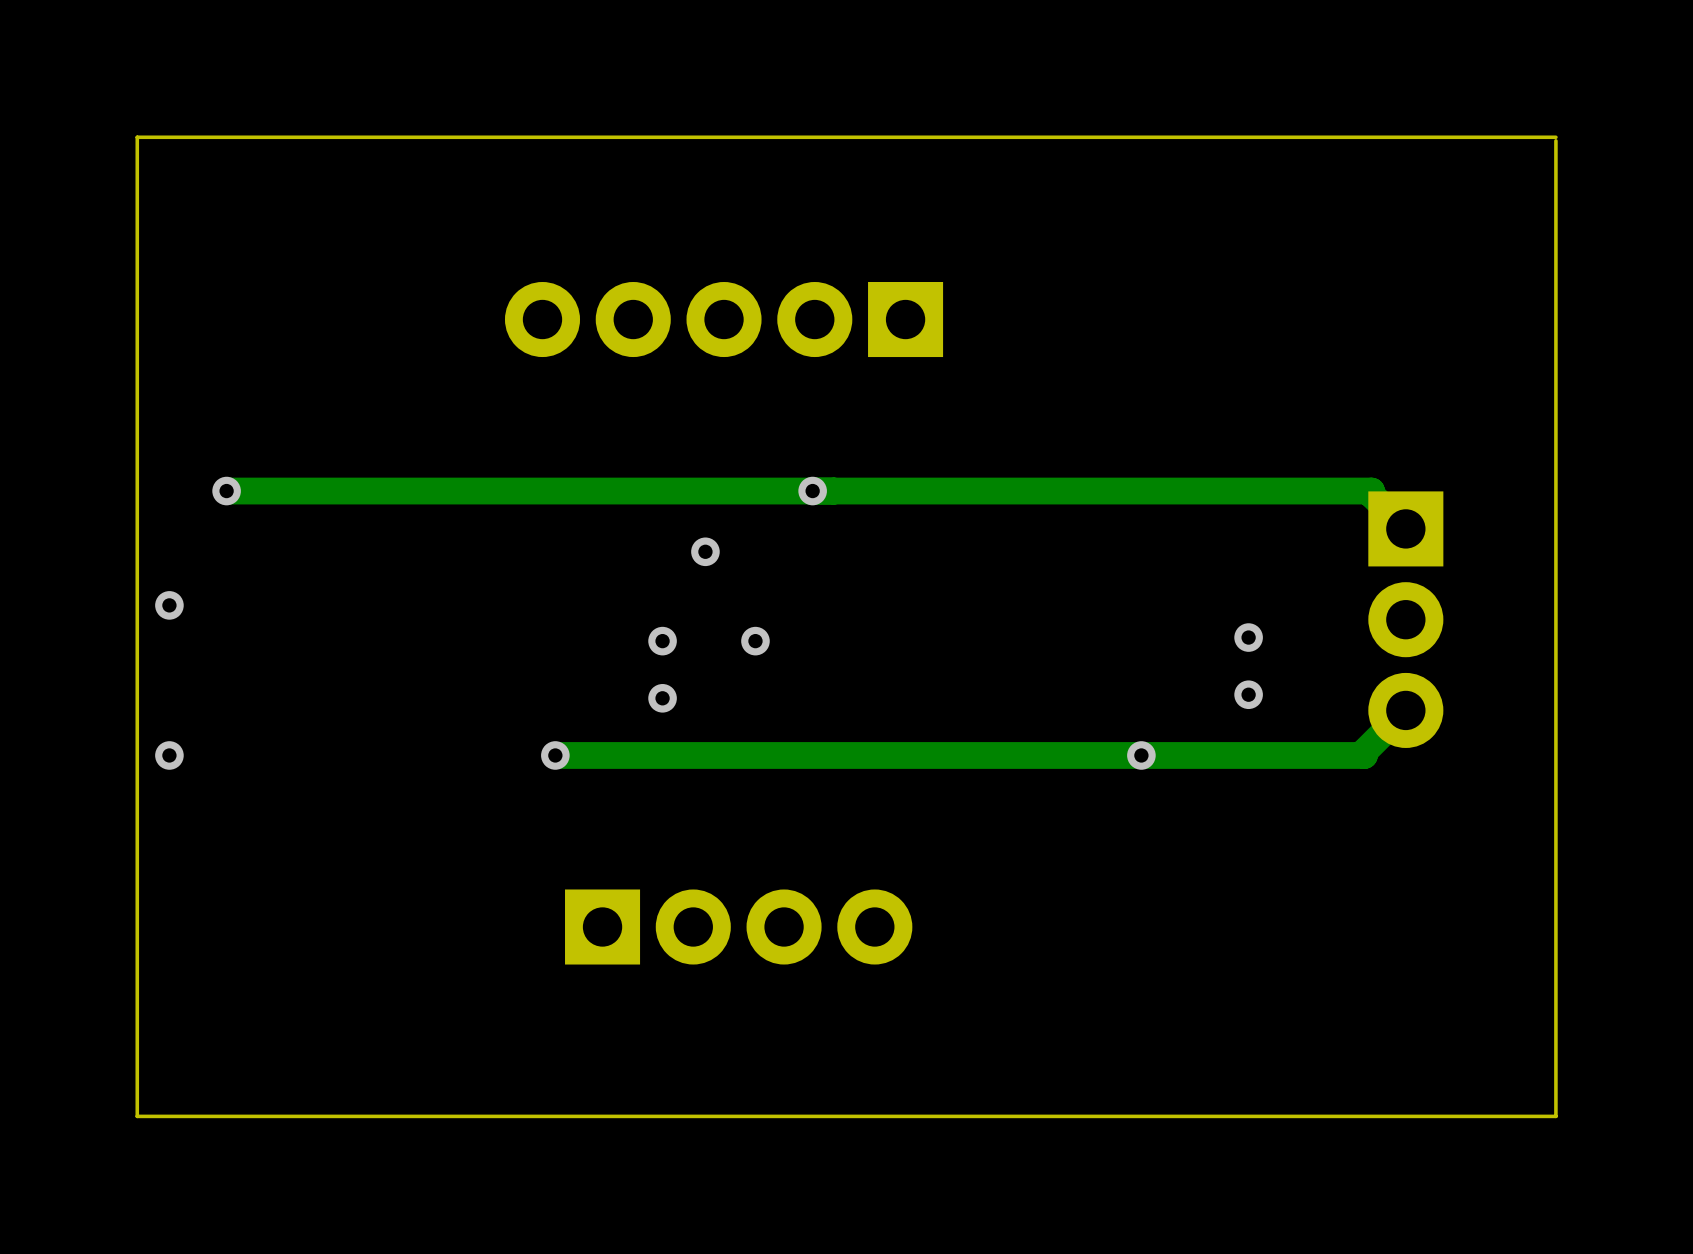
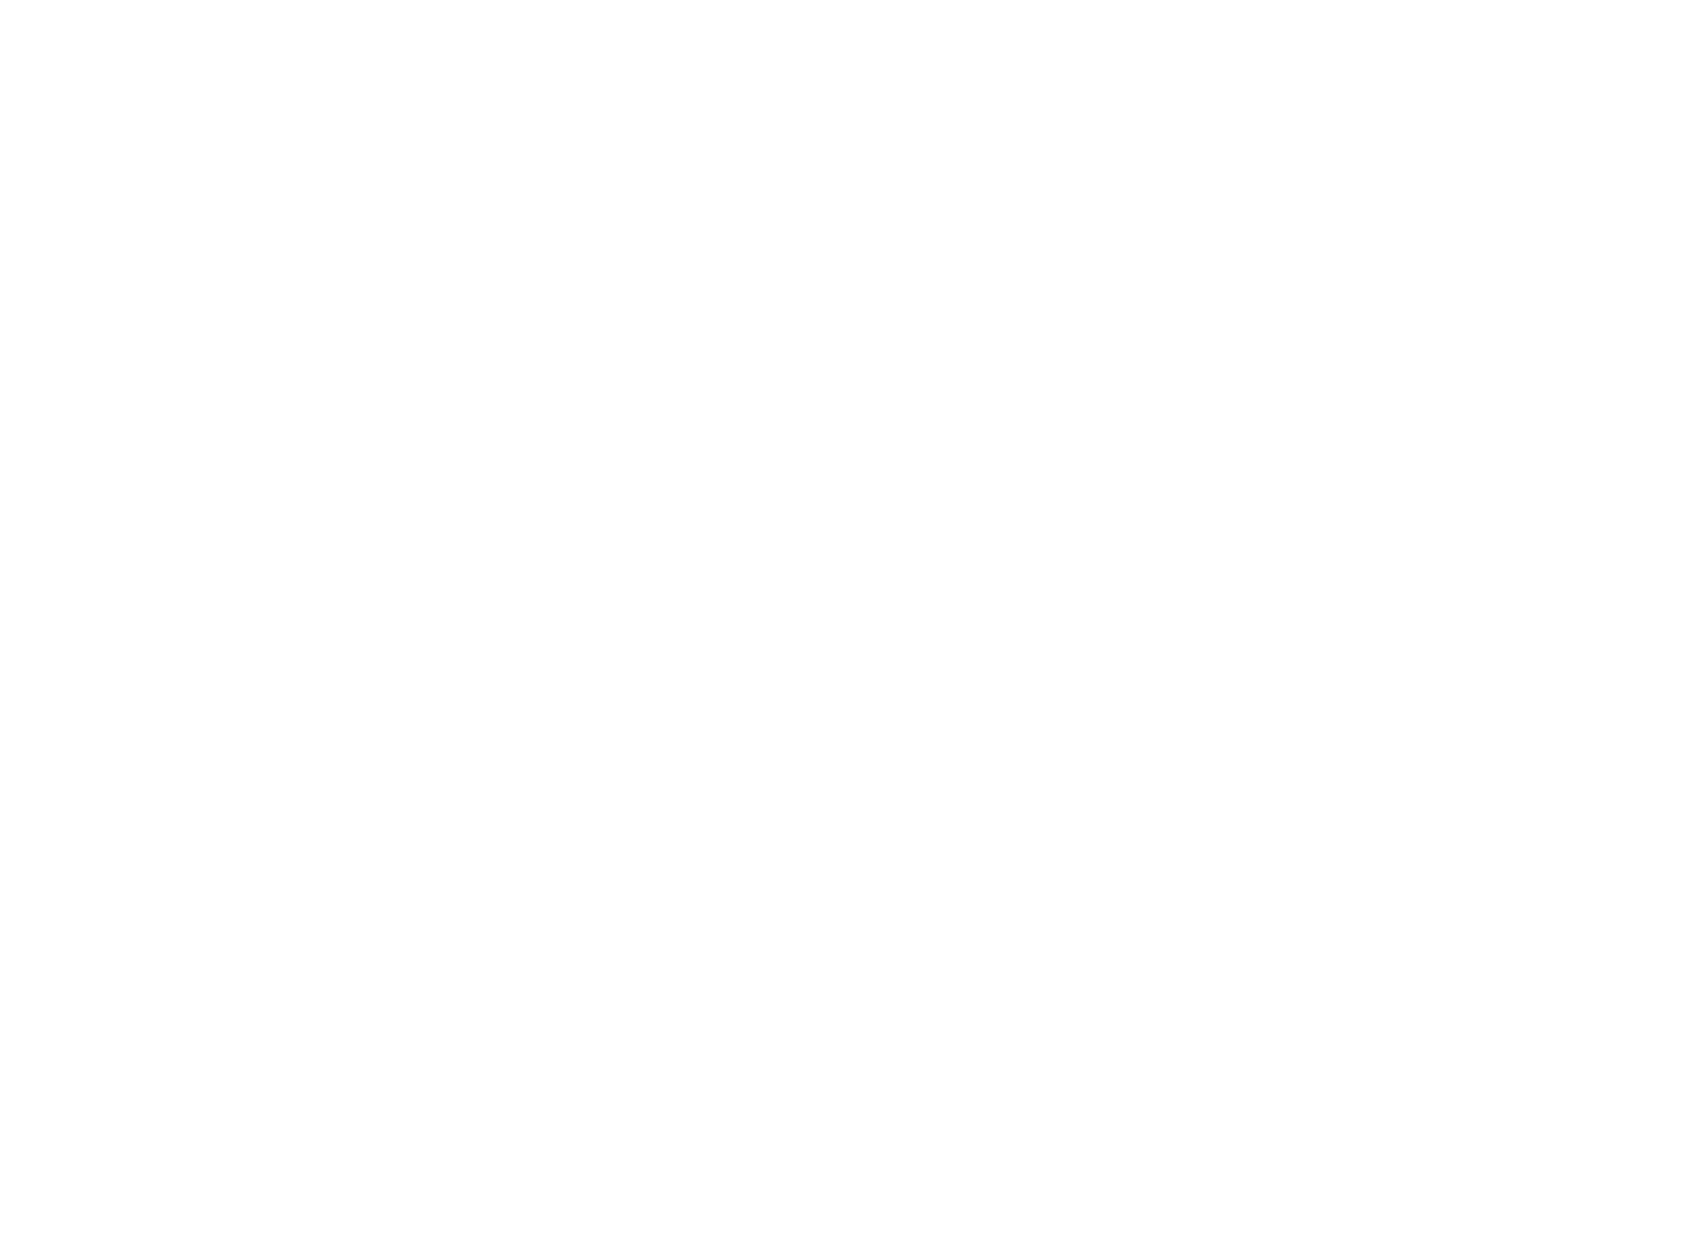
board edge: (1555, 137) (137, 137) (137, 1116) (1555, 1116) (1555, 140) -> none
part: (724, 319) -> none
track: (226, 491) (1371, 491) (1371, 494) (1405, 528) -> none
via: (226, 491) -> none
via: (812, 491) -> none
via: (705, 551) -> none
via: (169, 605) -> none
part: (1405, 619) -> none
via: (1248, 637) -> none
via: (662, 641) -> none
via: (755, 641) -> none
via: (1248, 694) -> none
via: (662, 698) -> none
track: (1405, 710) (1364, 751) (1364, 755) (555, 755) -> none
via: (169, 755) -> none
via: (555, 755) -> none
via: (1141, 755) -> none
part: (738, 927) -> none

